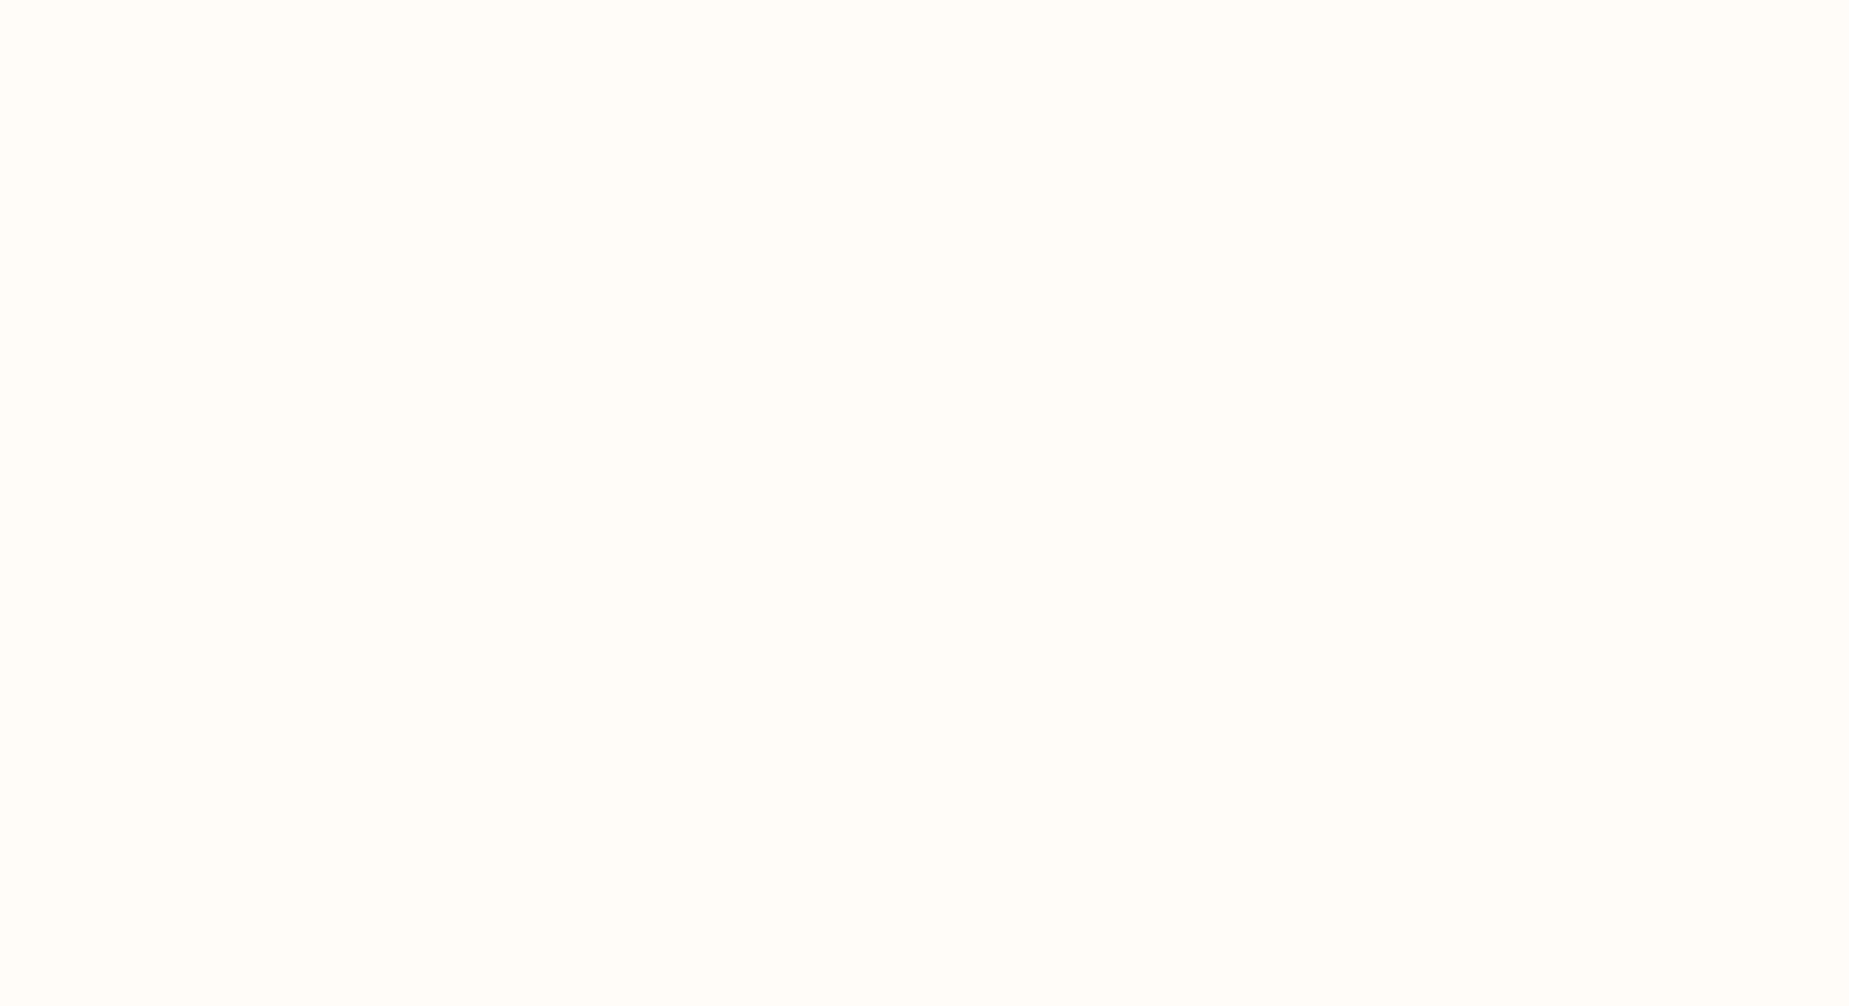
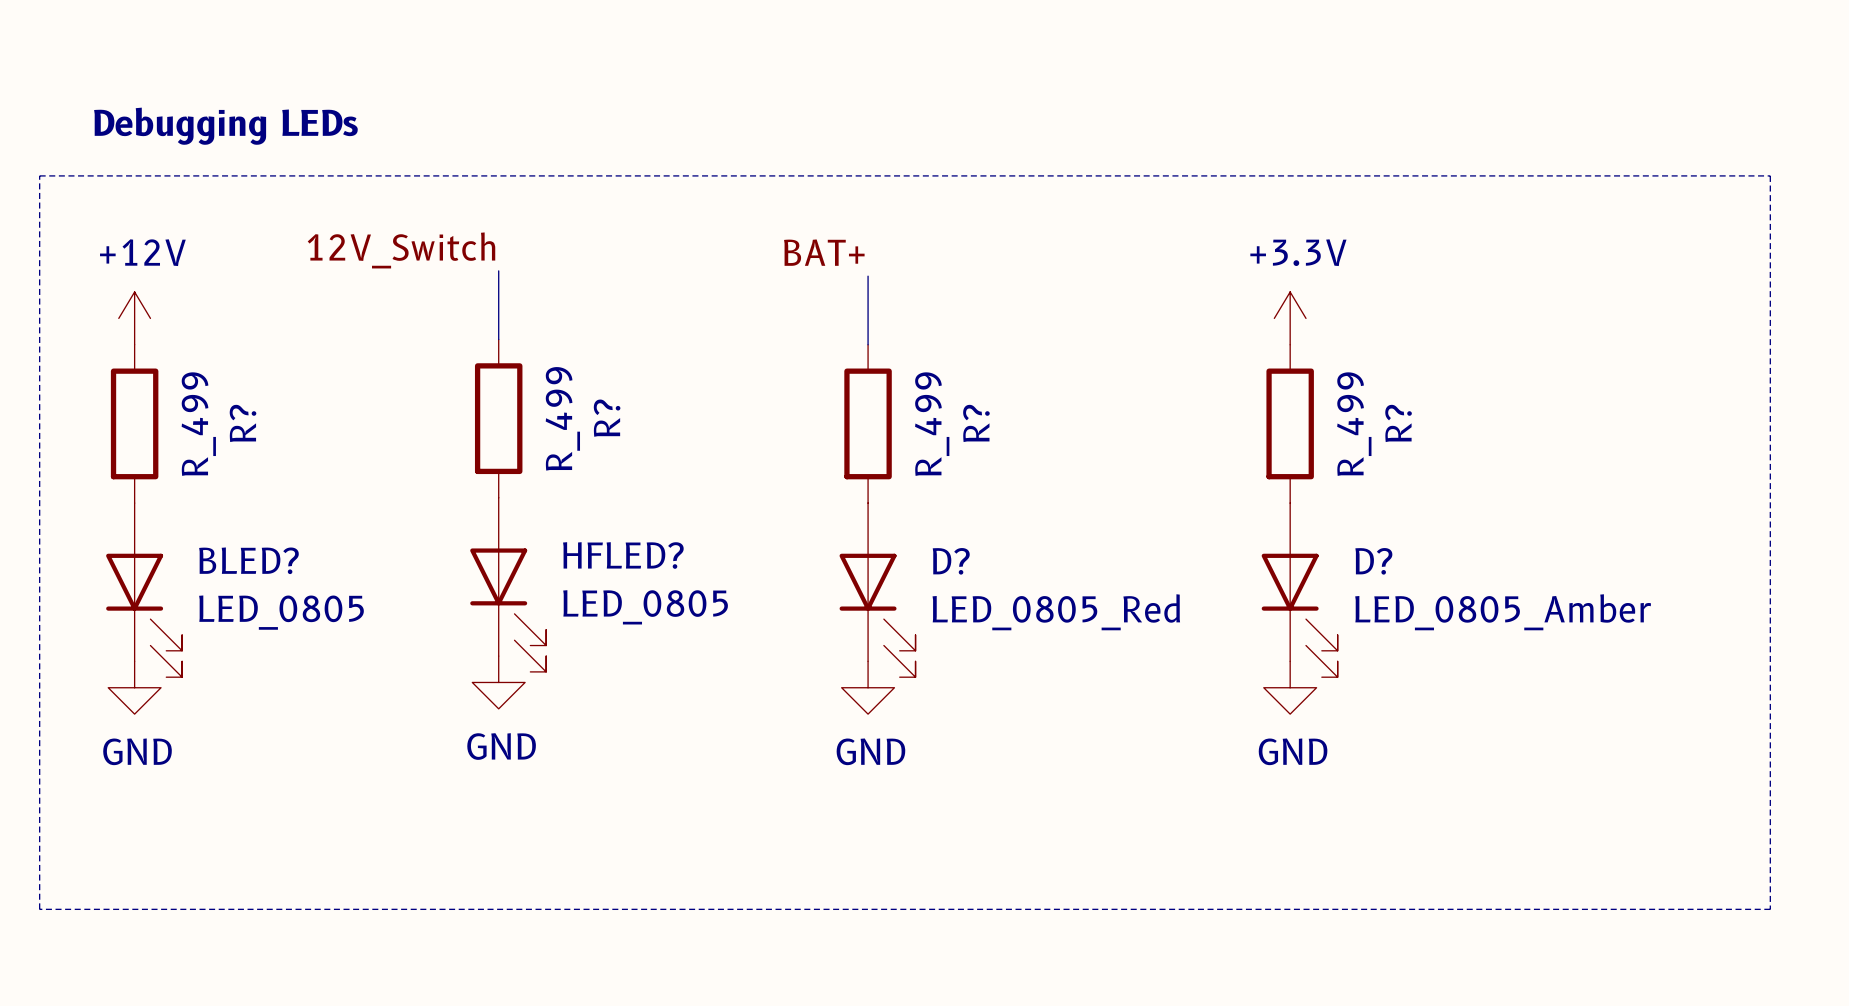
text: none -> Debugging LEDs (225, 126)
line: none -> (39, 175) (39, 909) (1770, 909) (1770, 175) (39, 175)
label: none -> 12V_Switch (401, 250)
label: none -> BAT+ (824, 252)
wire: none -> (498, 270) (498, 339)
wire: none -> (868, 276) (868, 344)
power symbol: none -> +12V (134, 318)
power symbol: none -> +3.3V (1290, 318)
R?: none -> R_499 (498, 418)
R?: none -> R_499 (134, 423)
R?: none -> R_499 (868, 423)
R?: none -> R_499 (1290, 423)
HFLED?: none -> LED_0805 (508, 584)
BLED?: none -> LED_0805 (144, 590)
D?: none -> LED_0805_Red (877, 590)
D?: none -> LED_0805_Amber (1299, 590)
power symbol: none -> GND (498, 682)
power symbol: none -> GND (134, 687)
power symbol: none -> GND (868, 687)
power symbol: none -> GND (1290, 687)

